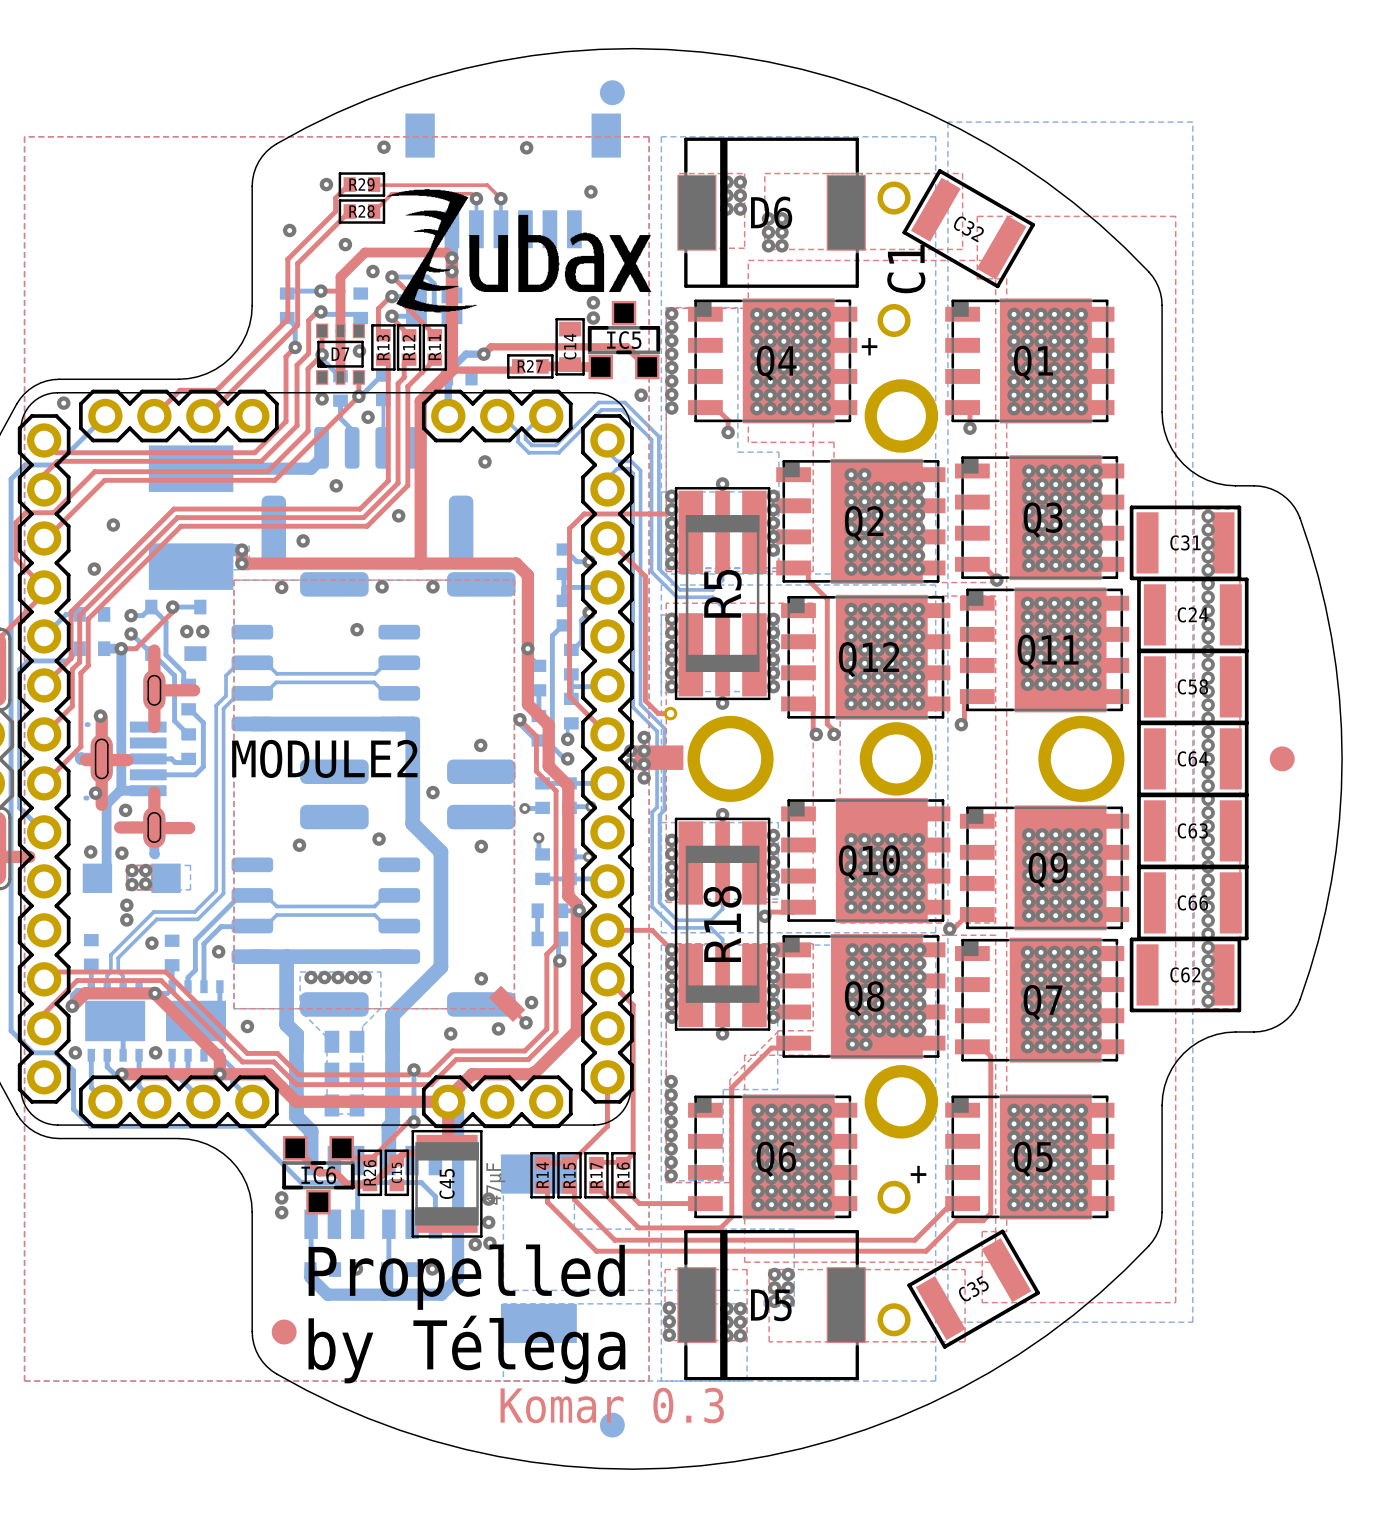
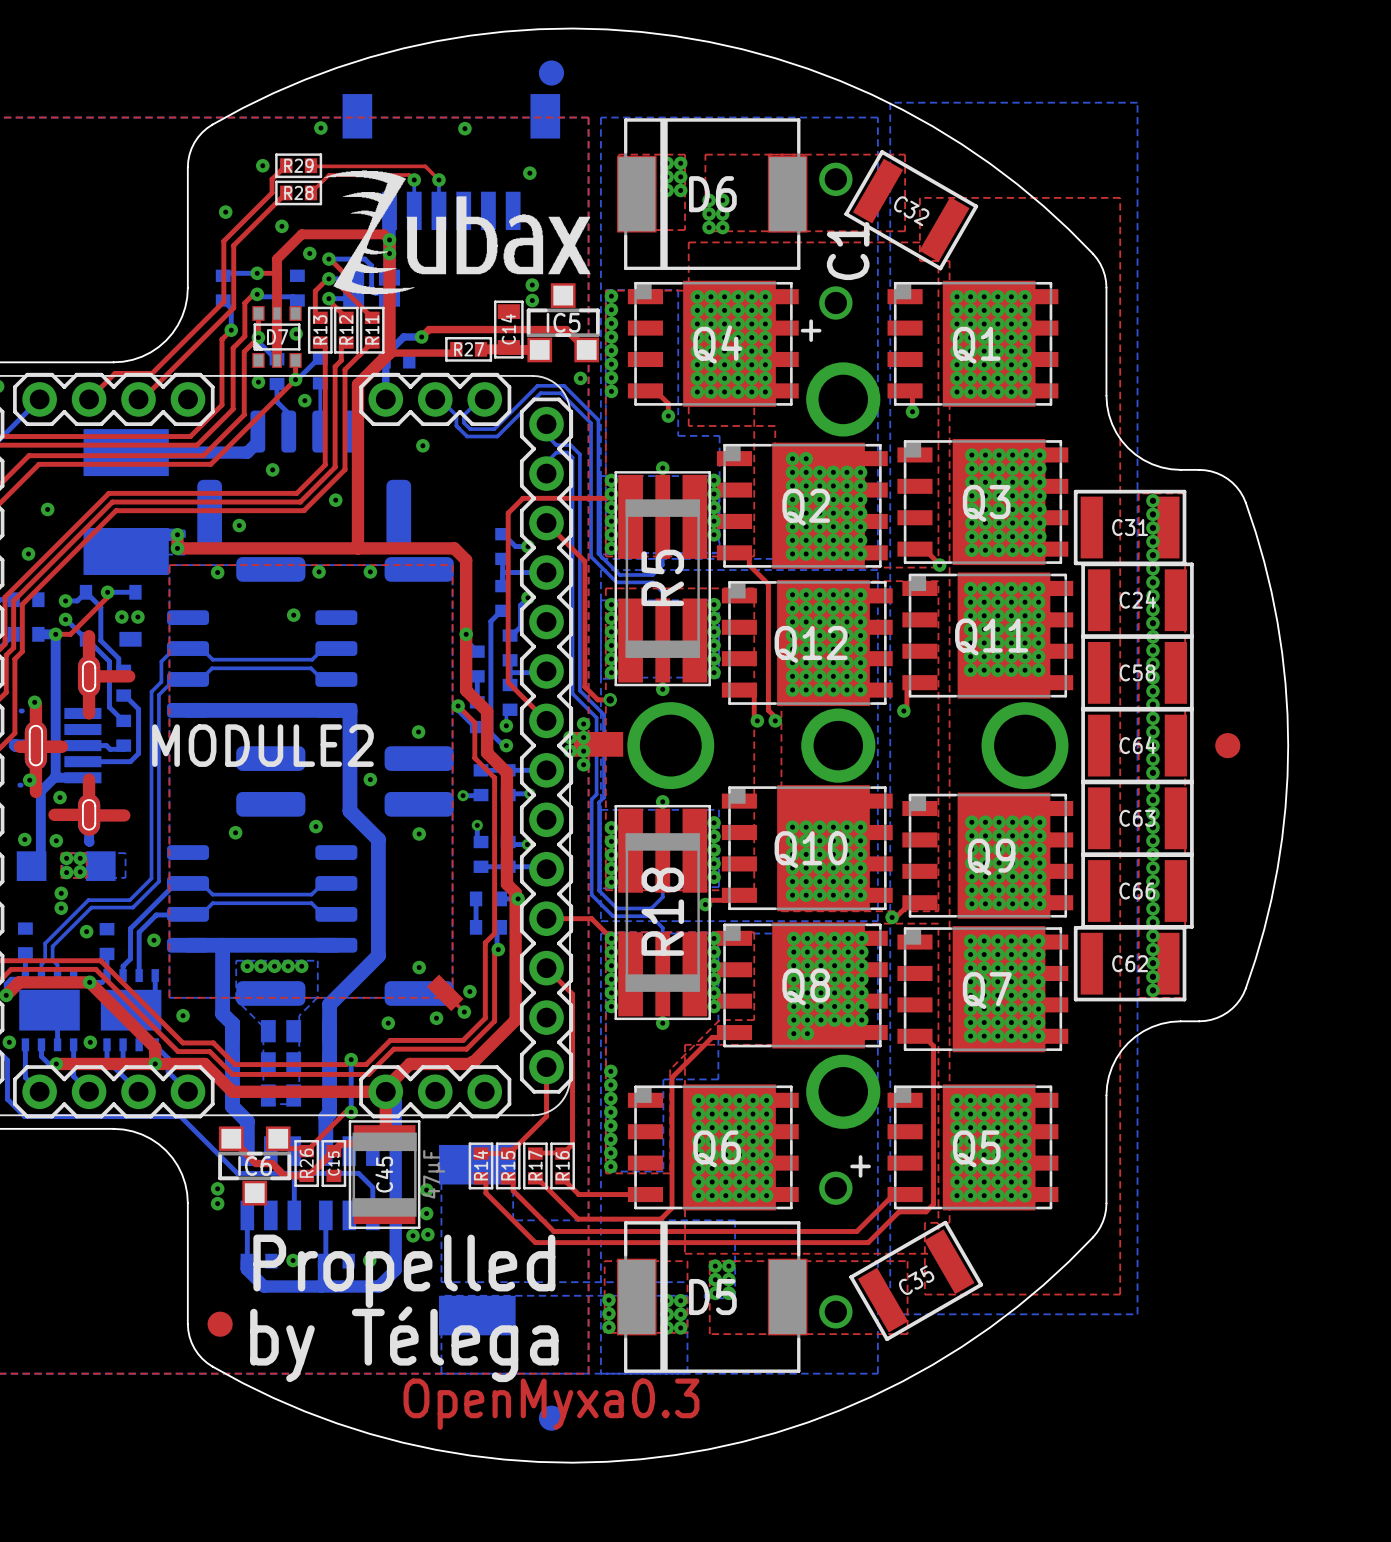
text: Komar 0.3 (612, 1405) -> OpenMyxa0.3 (551, 1404)

